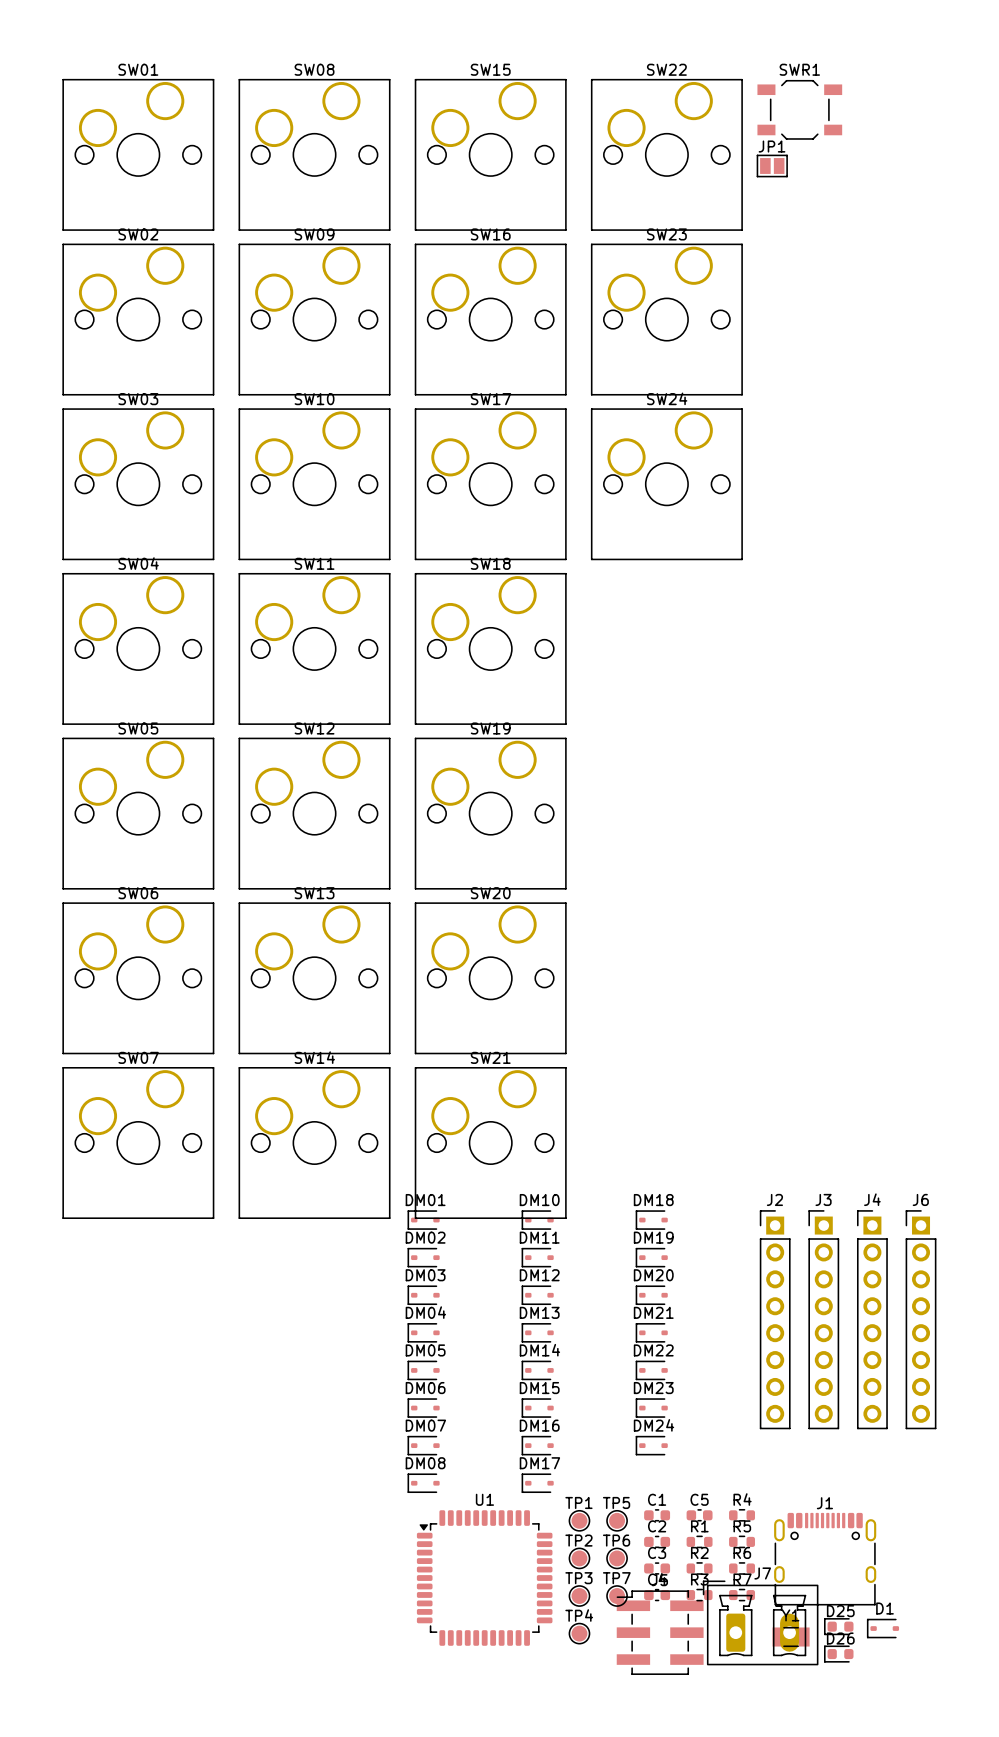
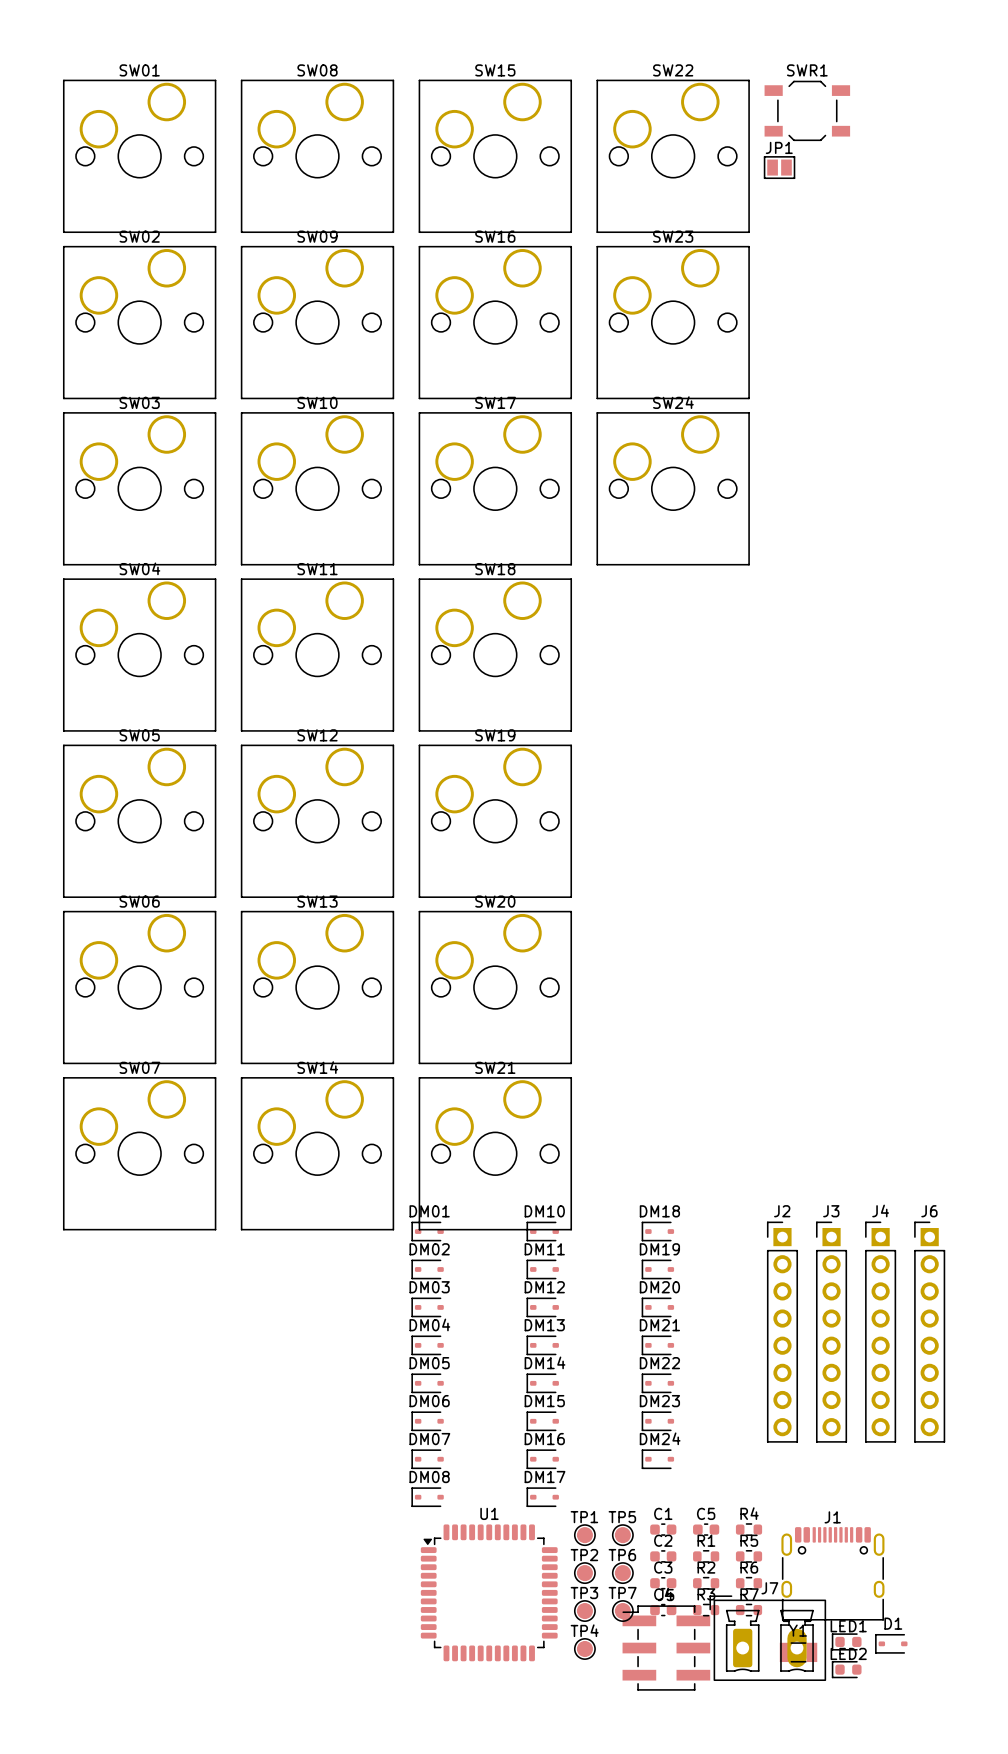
D25 name: D25 (840, 1611) -> LED1 (848, 1626)
D26 name: D26 (840, 1638) -> LED2 (848, 1653)

